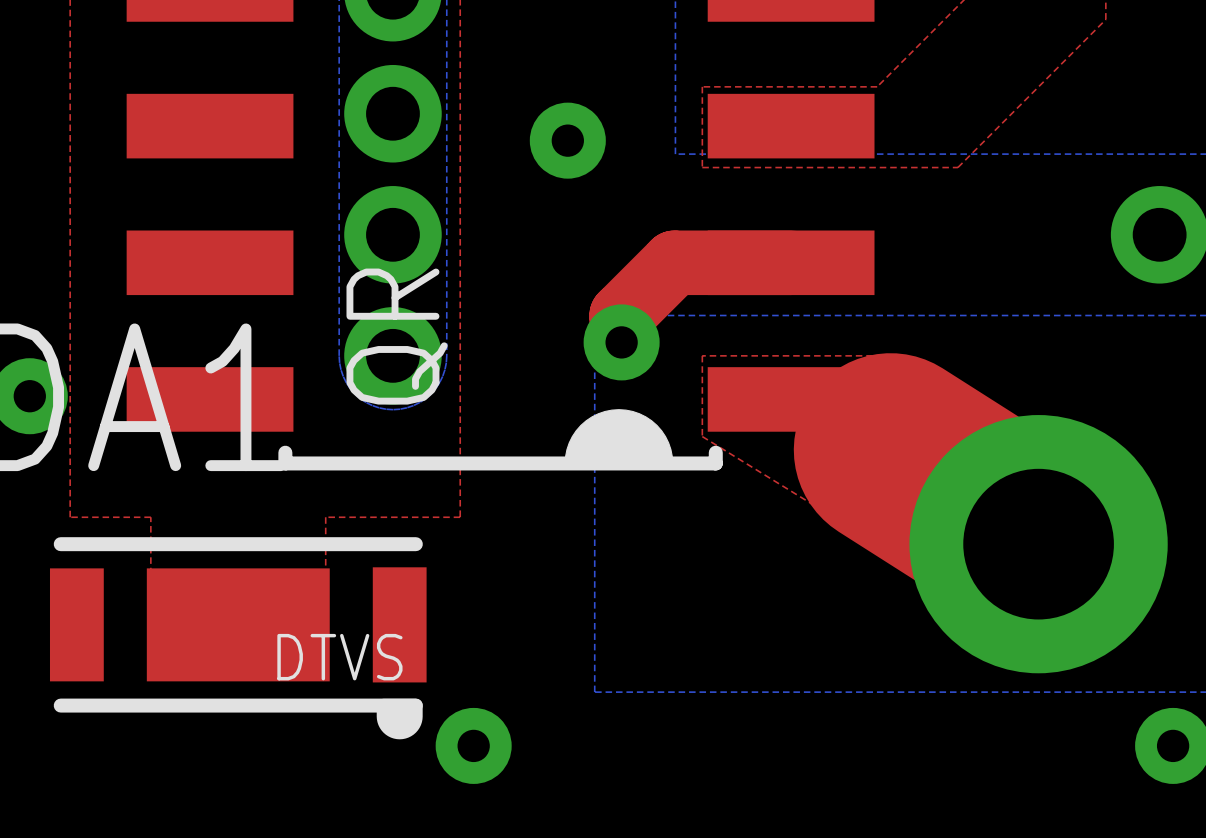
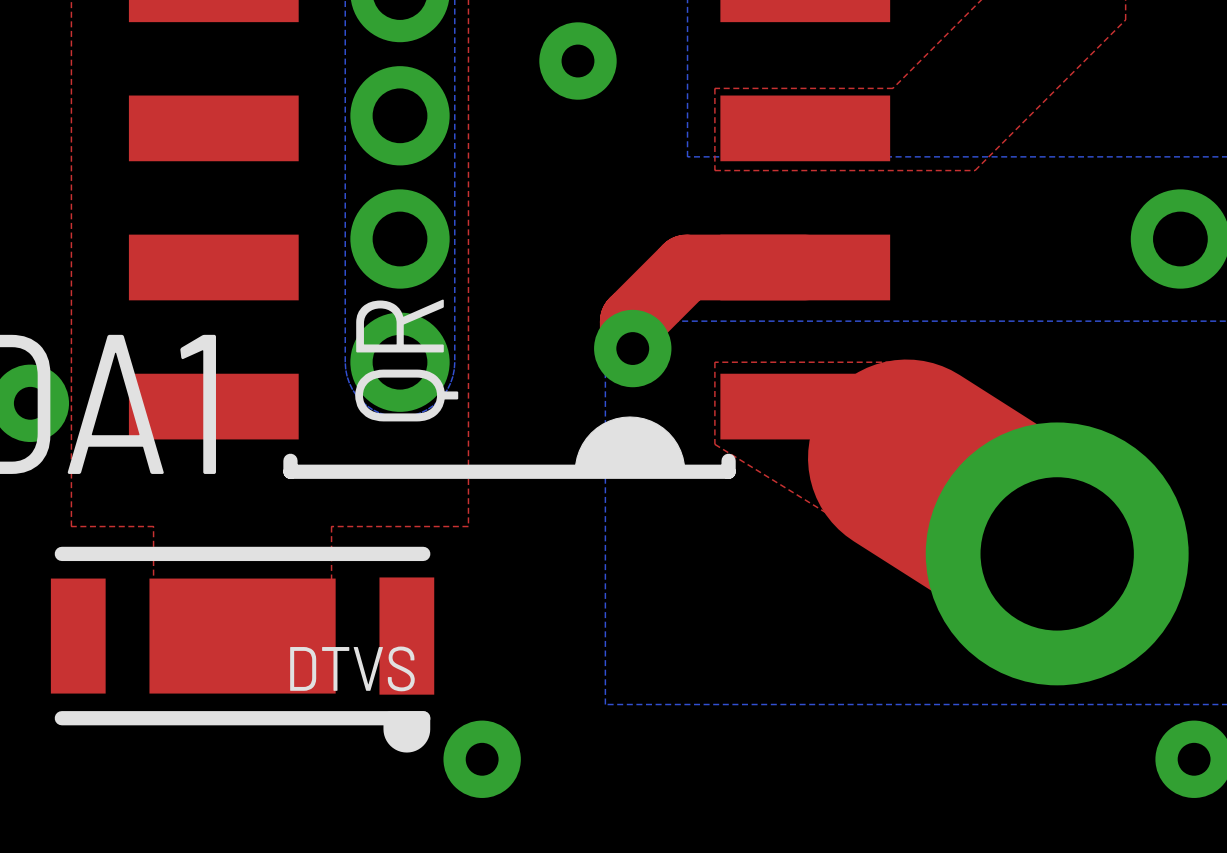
via position: (567, 140) -> (577, 61)

